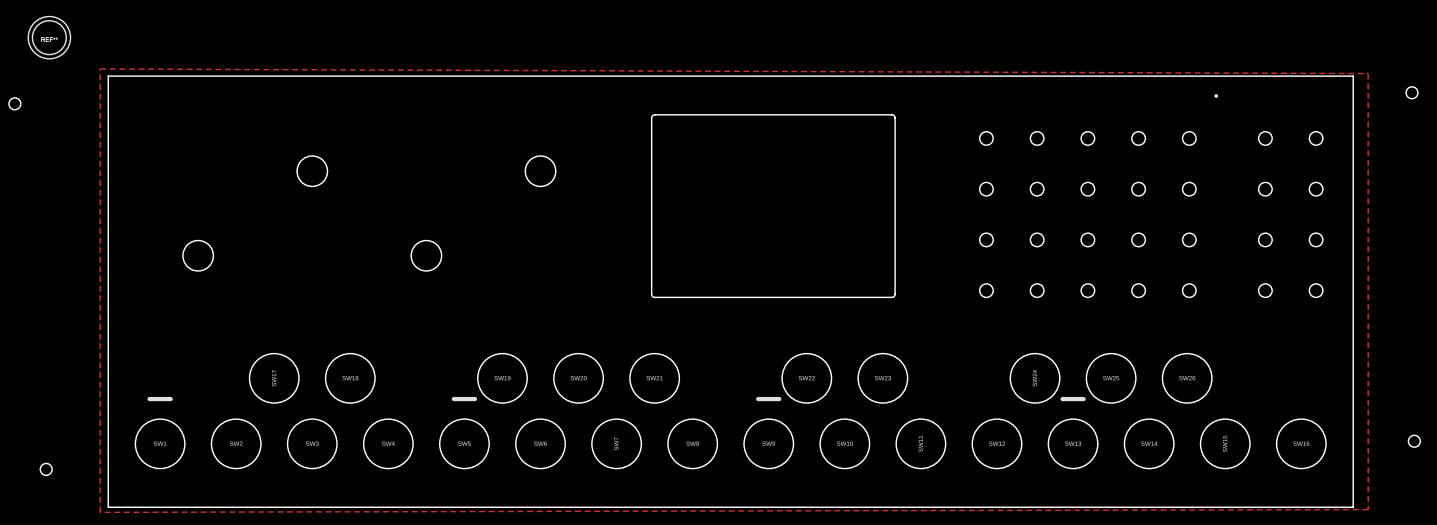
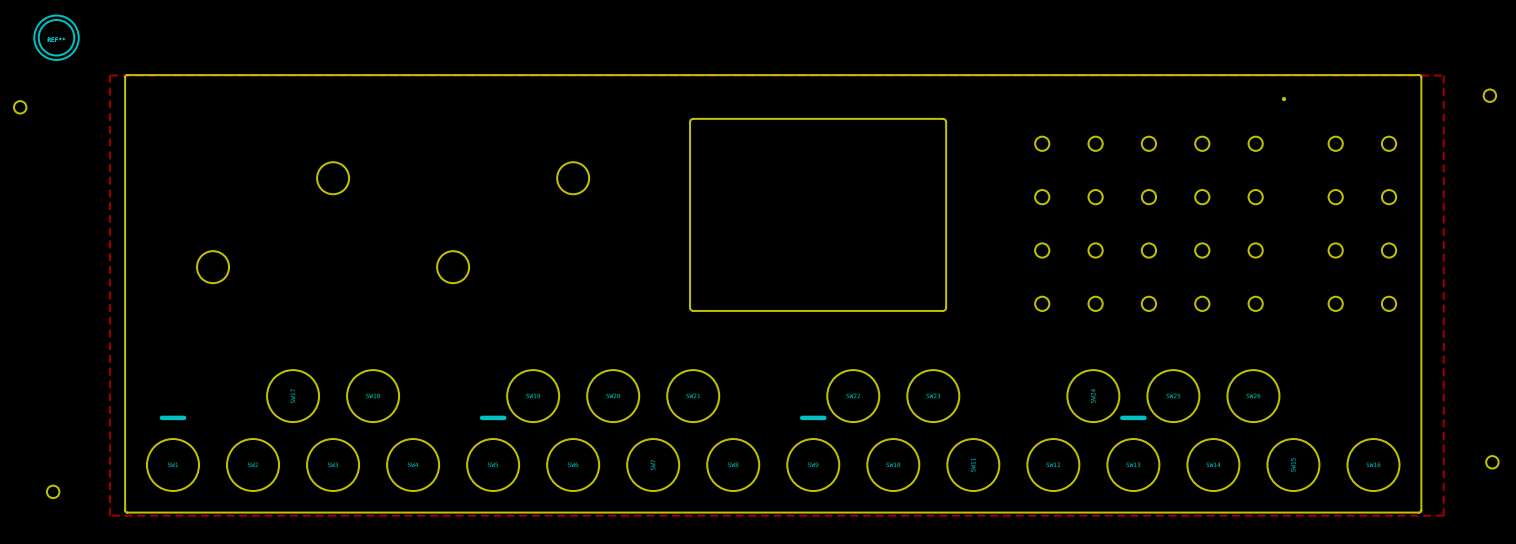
zone outline: (1368, 73) (100, 68) (100, 512) (1368, 509) (1368, 492) -> (1443, 75) (109, 75) (109, 515) (1443, 515)
board edge: (108, 76) (1353, 76) (1353, 507) (108, 507) (108, 76) -> (127, 75) (125, 77) (125, 510) (126, 512) (1419, 512) (1421, 510) (1421, 77) (1419, 75) (127, 75)

